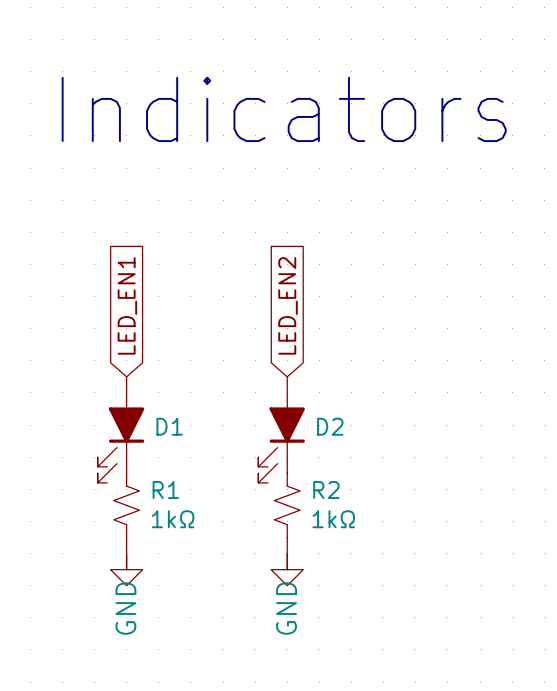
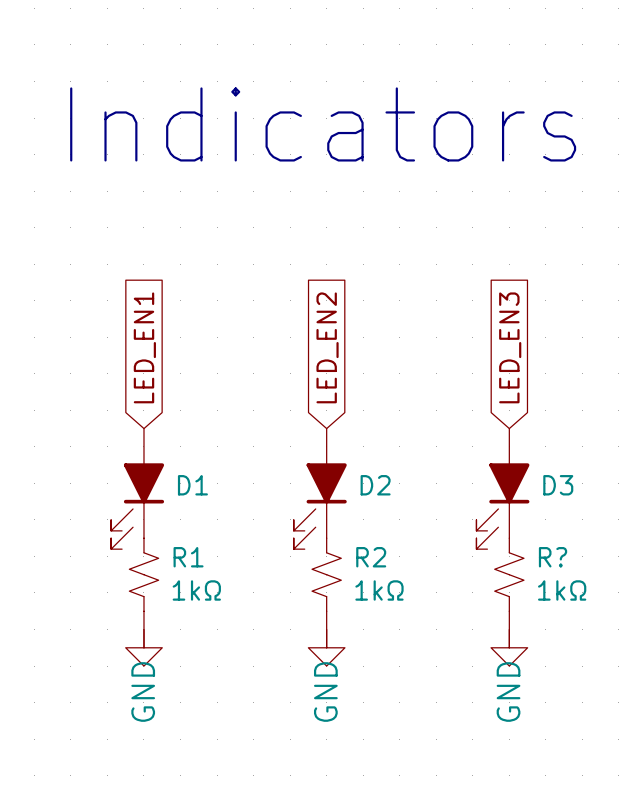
global label: none -> LED_EN3 (510, 347)
D3: none -> (502, 488)
R?: none -> (509, 574)
power symbol: none -> GND (509, 638)

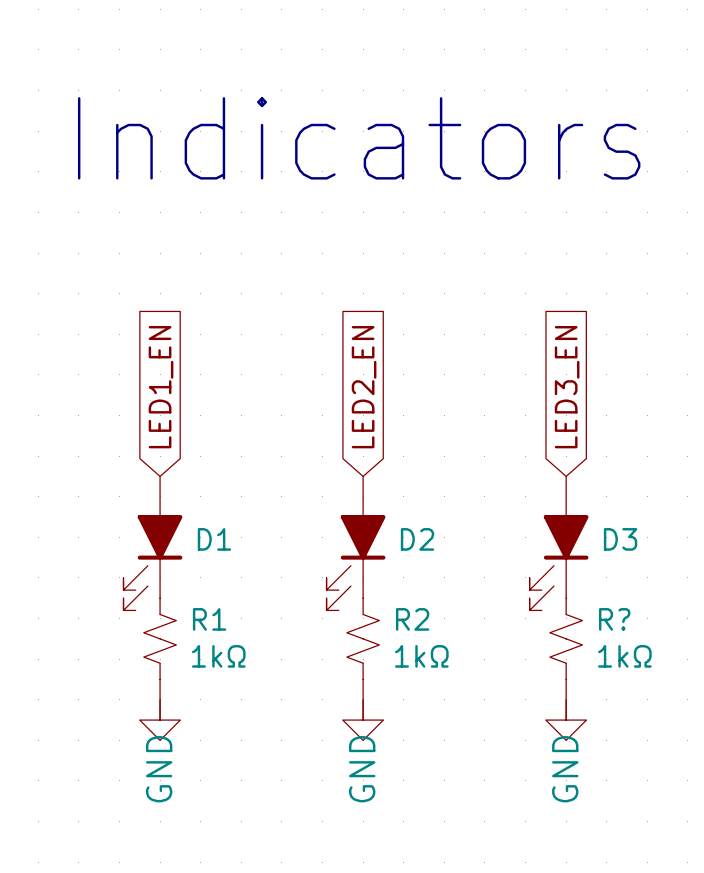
global label: LED_EN1 (144, 347) -> LED1_EN (161, 387)
global label: LED_EN2 (327, 347) -> LED2_EN (364, 387)
global label: LED_EN3 (510, 347) -> LED3_EN (567, 387)

